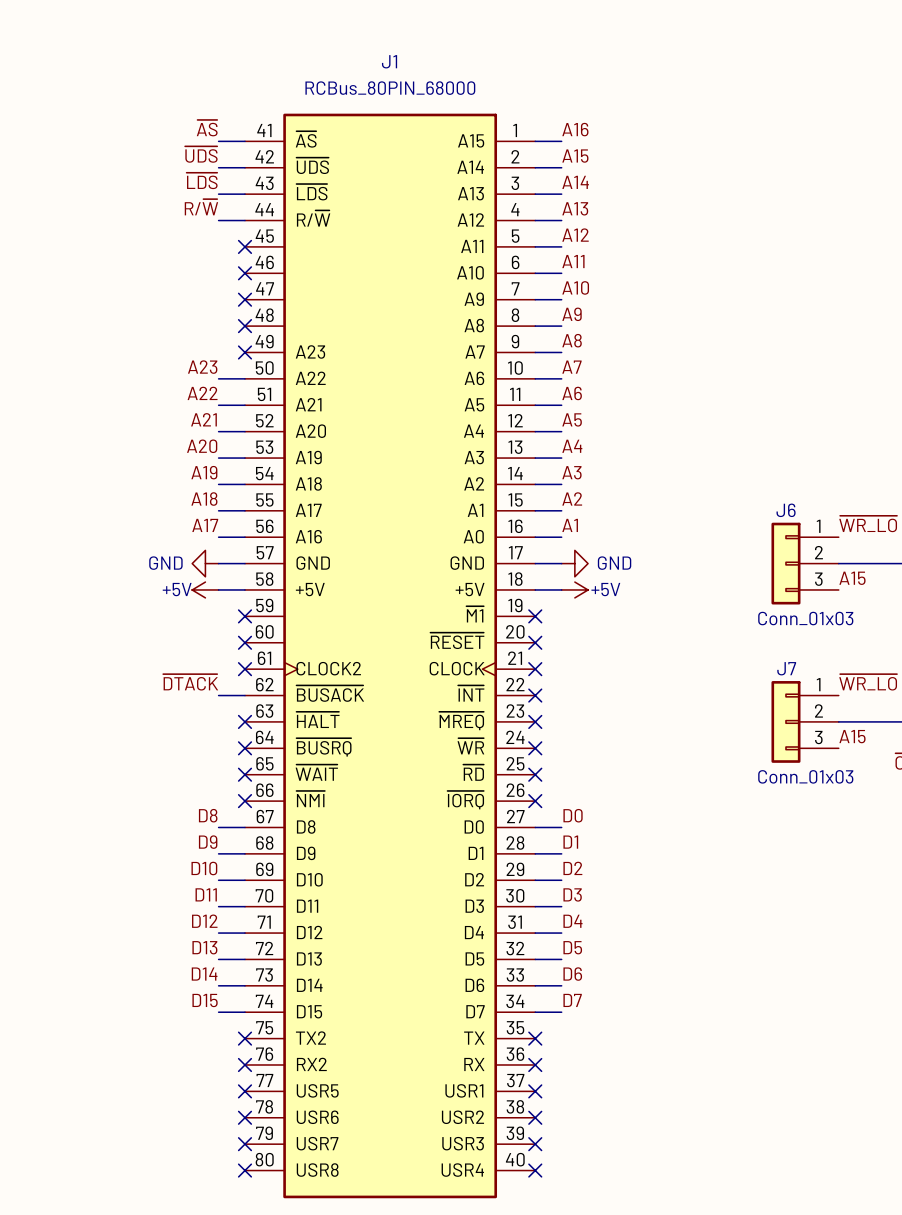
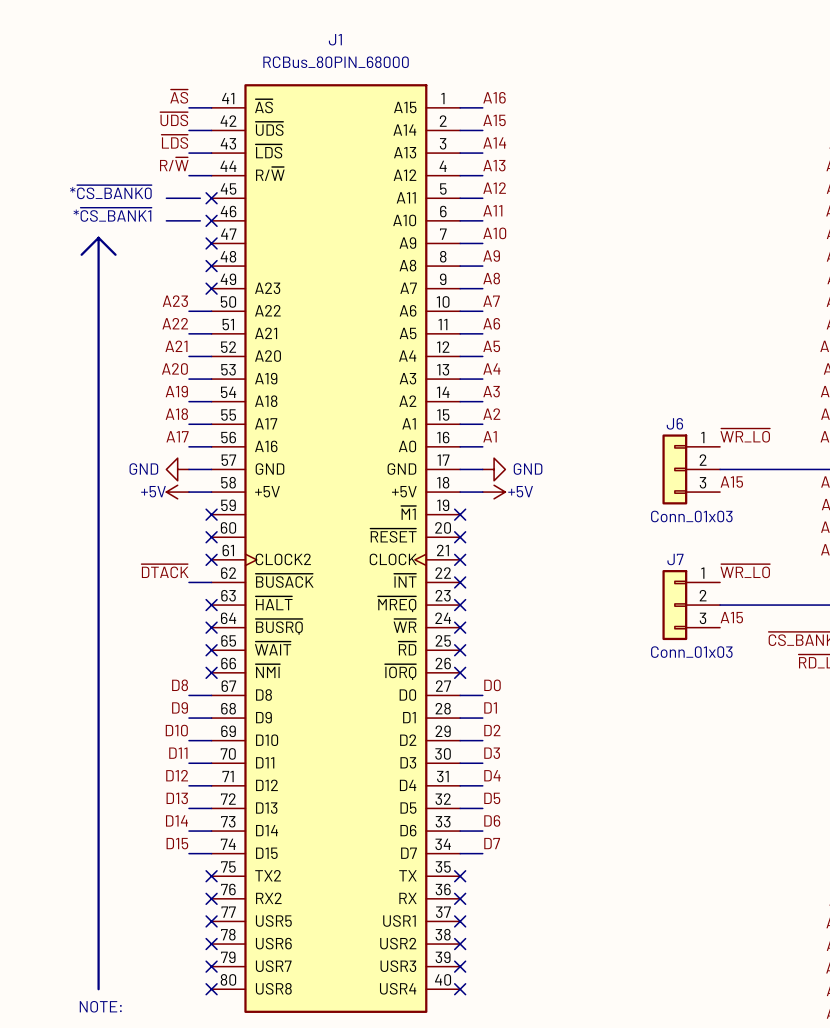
text: none -> *~{CS_BANK0} (110, 192)
line: none -> (166, 198) (200, 198)
text: none -> *~{CS_BANK1} (112, 214)
line: none -> (166, 220) (200, 220)
line: none -> (98, 237) (81, 254)
line: none -> (98, 237) (115, 254)
line: none -> (98, 237) (98, 989)
text: none -> NOTE: (100, 1006)

